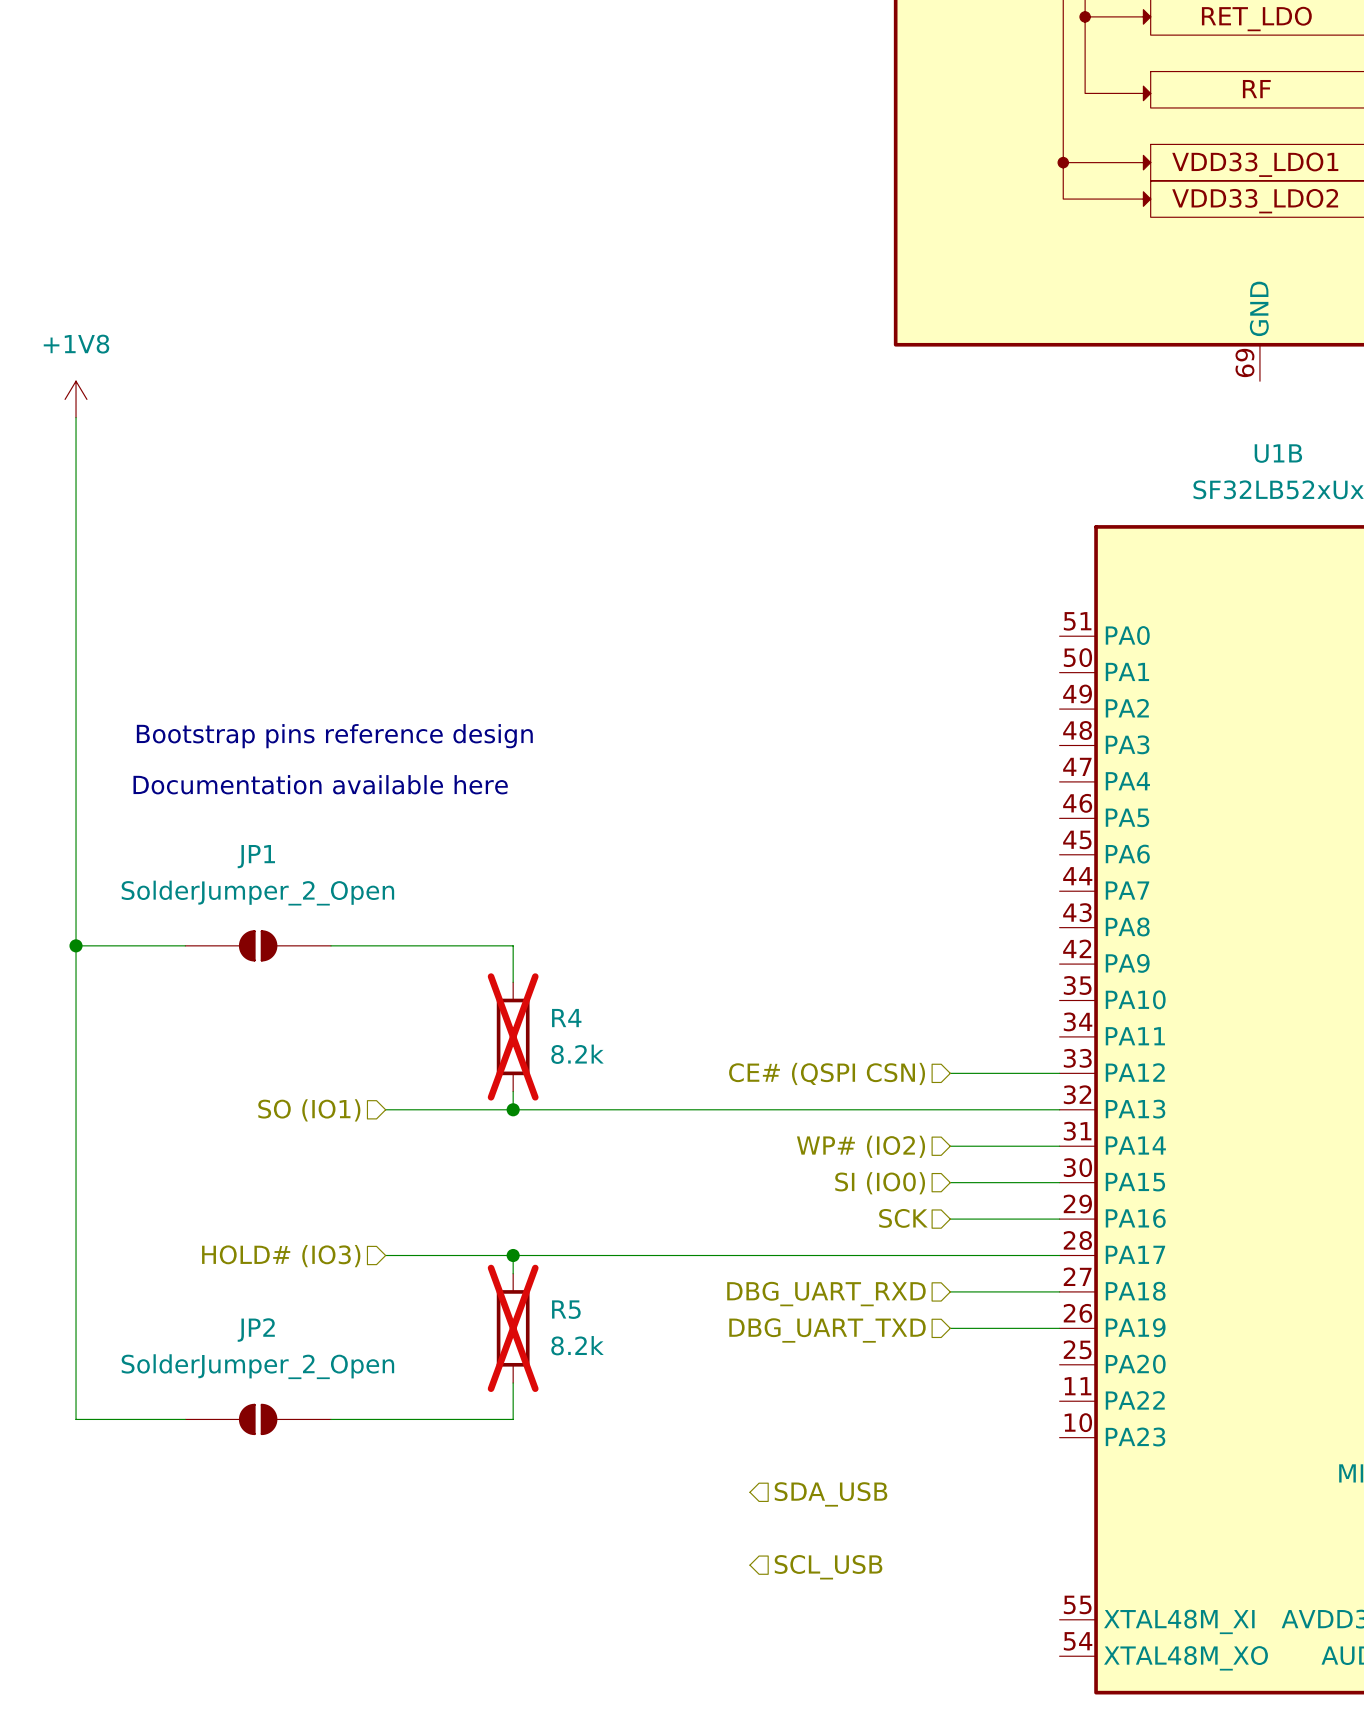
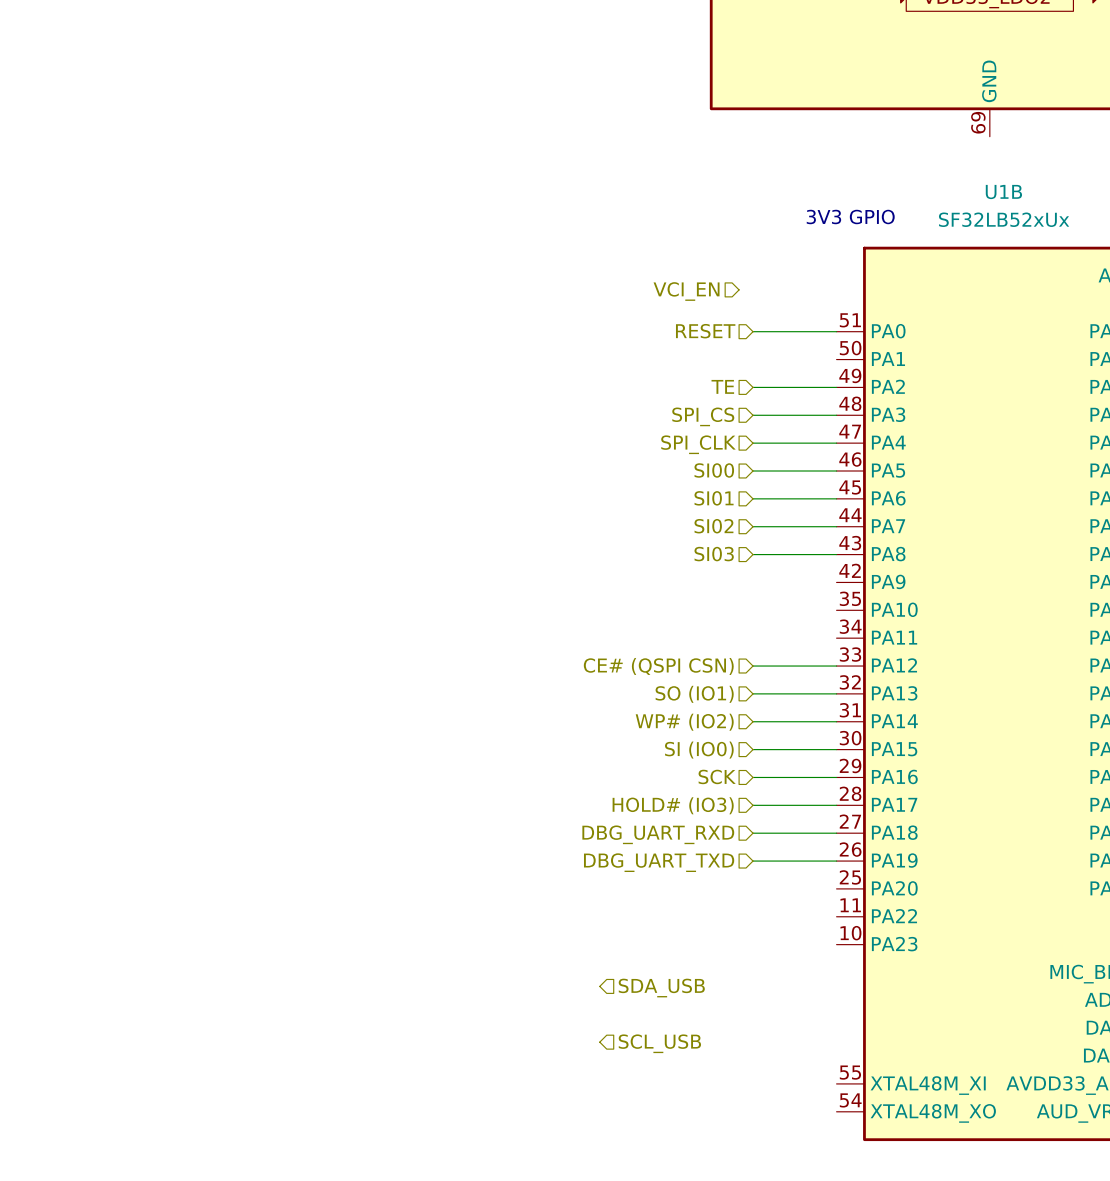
power symbol: +1V8 (76, 399) -> none
wire: (76, 417) (76, 1419) (185, 1419) -> none
text: none -> 3V3 GPIO (850, 217)
hierarchical label: none -> VCI_EN (686, 291)
hierarchical label: none -> RESET (705, 331)
wire: none -> (753, 331) (836, 331)
hierarchical label: none -> TE (722, 386)
wire: none -> (753, 387) (836, 387)
text: Bootstrap pins reference design (334, 736) -> none
wire: none -> (753, 415) (836, 415)
hierarchical label: none -> SPI_CS (703, 416)
wire: none -> (753, 443) (836, 443)
text: Documentation available here (320, 784) -> none
hierarchical label: none -> SPI_CLK (698, 444)
hierarchical label: none -> SI00 (714, 470)
wire: none -> (753, 471) (836, 471)
hierarchical label: none -> SI01 (714, 498)
wire: none -> (753, 498) (836, 498)
hierarchical label: none -> SI02 (713, 526)
wire: none -> (753, 526) (836, 526)
hierarchical label: none -> SI03 (714, 554)
wire: none -> (753, 554) (836, 554)
wire: (76, 945) (185, 945) -> none
junction: (76, 945) -> none
JP1: SolderJumper_2_Open (258, 945) -> none
wire: (331, 945) (513, 945) (513, 982) -> none
R4: (513, 1036) -> none
wire: (513, 1091) (513, 1109) -> none
wire: (385, 1109) (950, 1109) -> none
junction: (513, 1109) -> none
hierarchical label: SO (IO1) (309, 1110) -> none
hierarchical label: none -> SO (IO1) (694, 694)
wire: (385, 1255) (950, 1255) -> none
wire: (513, 1255) (513, 1273) -> none
junction: (513, 1255) -> none
hierarchical label: HOLD# (IO3) (281, 1256) -> none
hierarchical label: none -> HOLD# (IO3) (673, 805)
R5: (513, 1328) -> none
wire: (513, 1383) (513, 1419) (331, 1419) -> none
JP2: SolderJumper_2_Open (258, 1419) -> none

